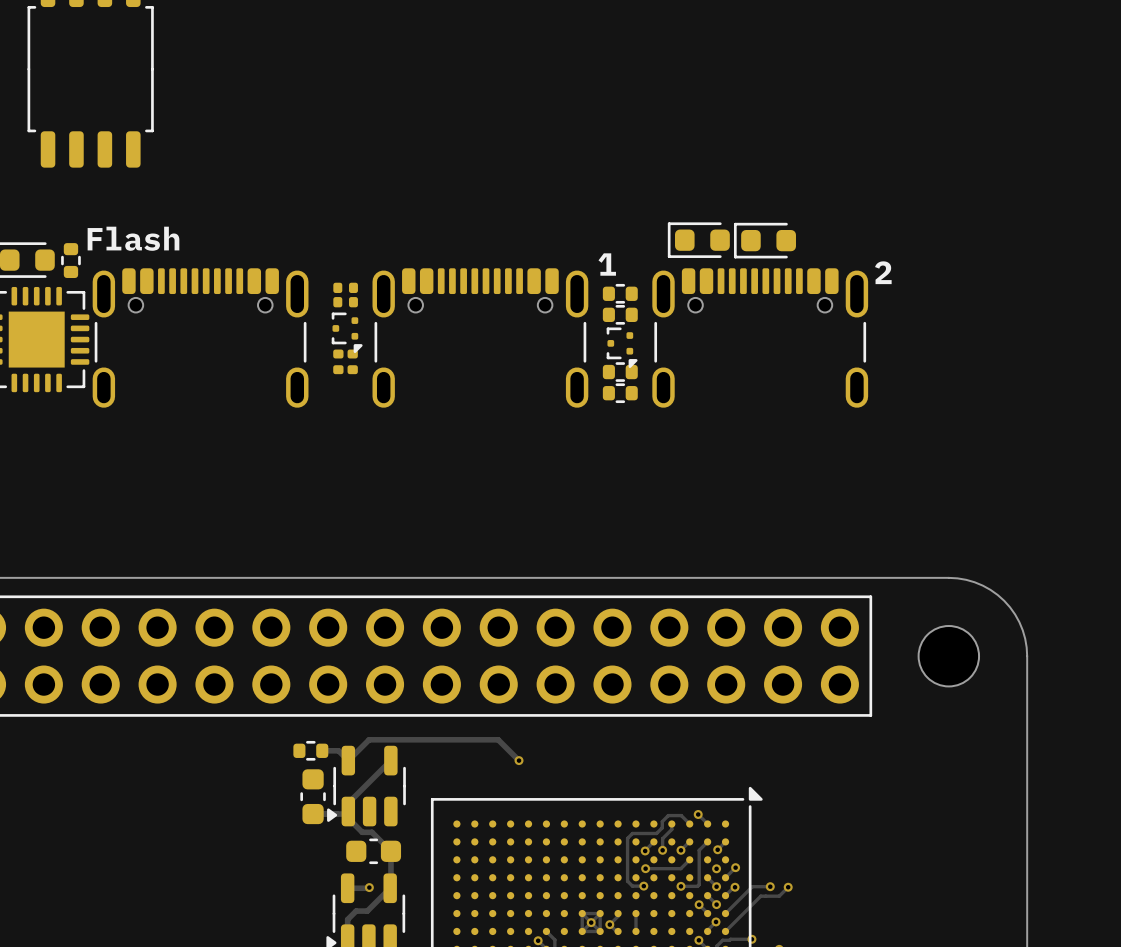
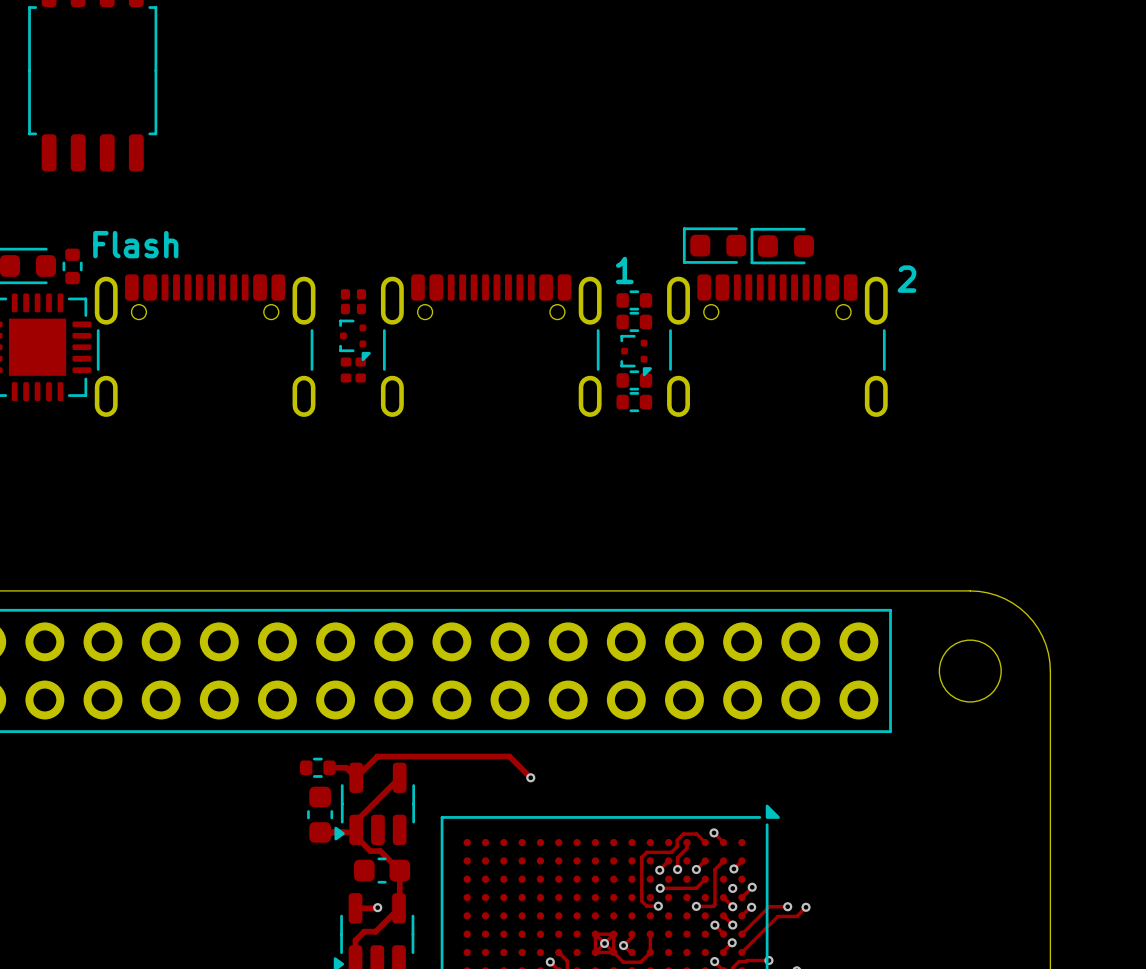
track: none -> (613, 952) (623, 962) (640, 962) (650, 952)

